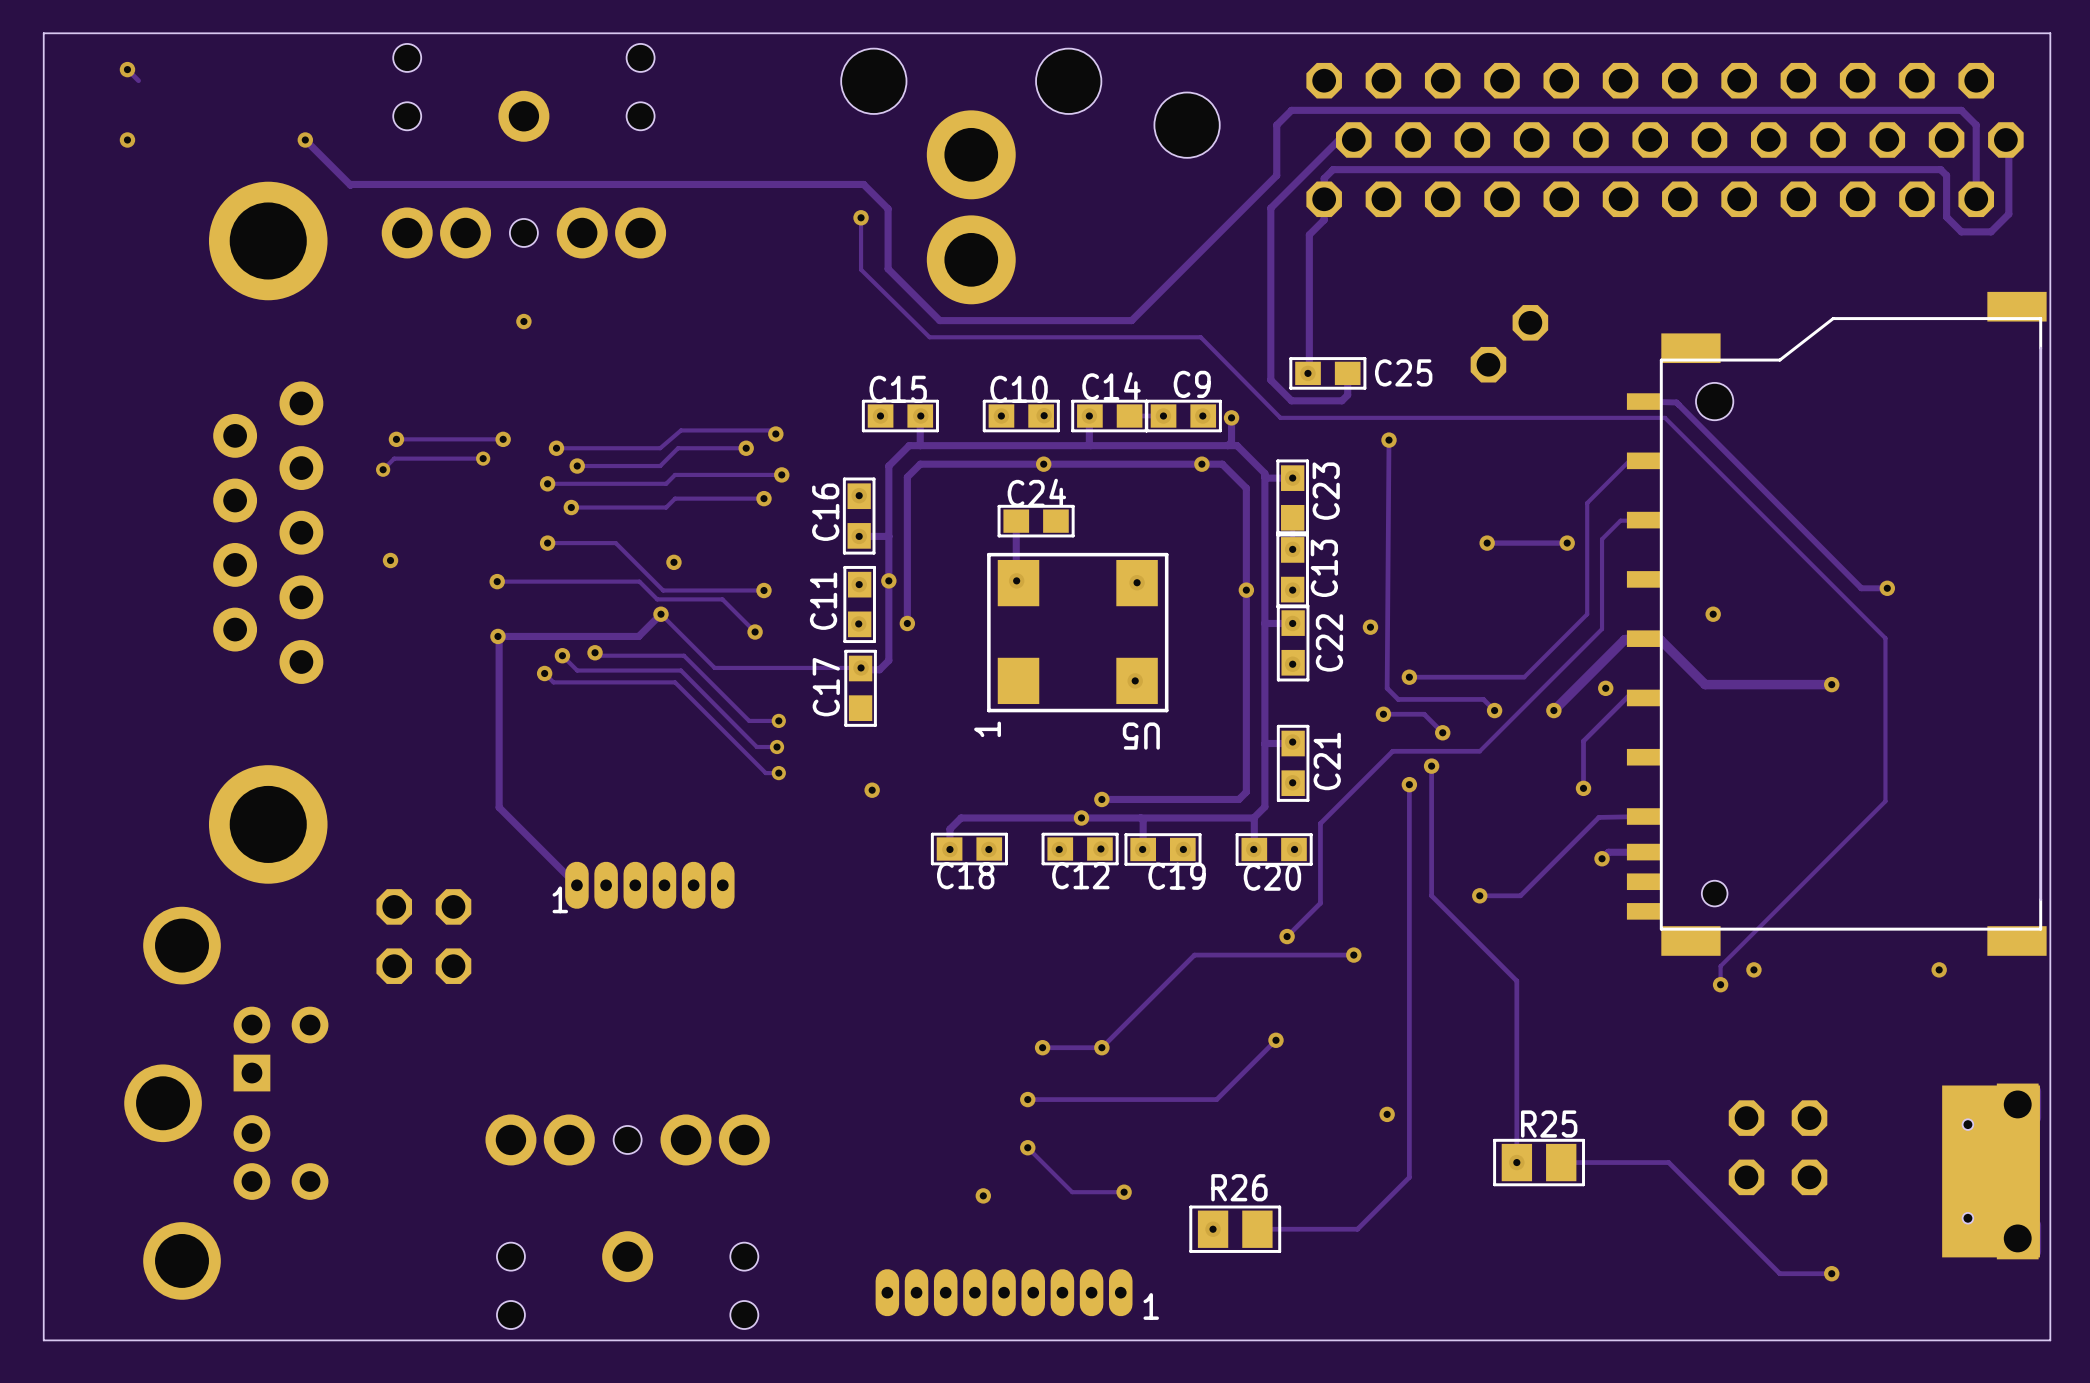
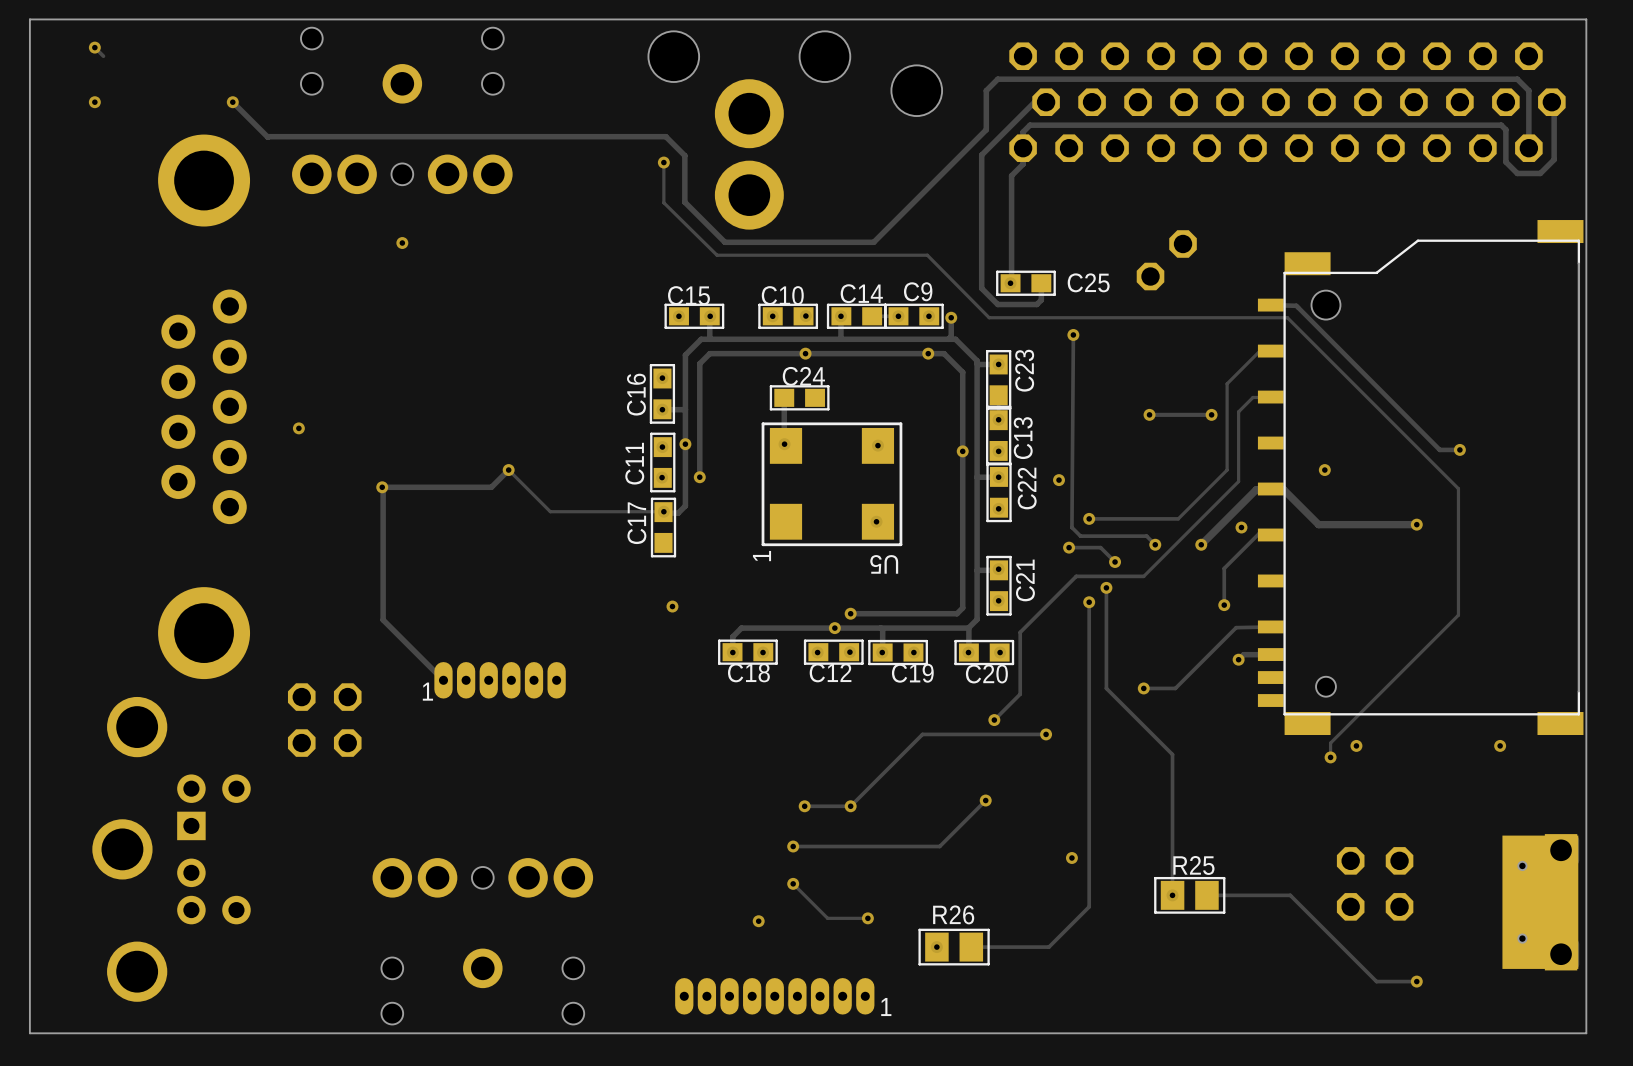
track: (775, 434) (772, 430) (680, 430) (660, 448) (556, 448) -> none
via: (775, 434) -> none
via: (396, 439) -> none
track: (503, 439) (396, 439) -> none
via: (503, 439) -> none
via: (556, 448) -> none
track: (746, 448) (678, 448) (660, 466) (577, 466) -> none
via: (746, 448) -> none
track: (483, 458) (394, 458) (383, 469) -> none
via: (483, 458) -> none
via: (577, 466) -> none
via: (383, 469) -> none
track: (781, 474) (675, 474) (666, 483) (547, 483) -> none
via: (781, 474) -> none
via: (547, 483) -> none
track: (763, 498) (675, 498) (666, 507) (571, 507) -> none
via: (763, 498) -> none
via: (571, 507) -> none
track: (547, 543) (615, 543) (663, 590) (763, 590) -> none
via: (547, 543) -> none
via: (673, 562) -> none
track: (497, 581) (639, 581) (657, 599) (722, 599) (755, 632) -> none
via: (497, 581) -> none
via: (763, 590) -> none
via: (755, 632) -> none
track: (595, 652) (598, 655) (683, 655) (749, 720) (778, 720) -> none
via: (595, 652) -> none
track: (562, 655) (577, 670) (680, 670) (756, 747) (777, 747) -> none
via: (562, 655) -> none
track: (544, 673) (553, 682) (675, 682) (765, 773) (778, 773) -> none
via: (544, 673) -> none
via: (778, 720) -> none
via: (777, 747) -> none
via: (778, 773) -> none

